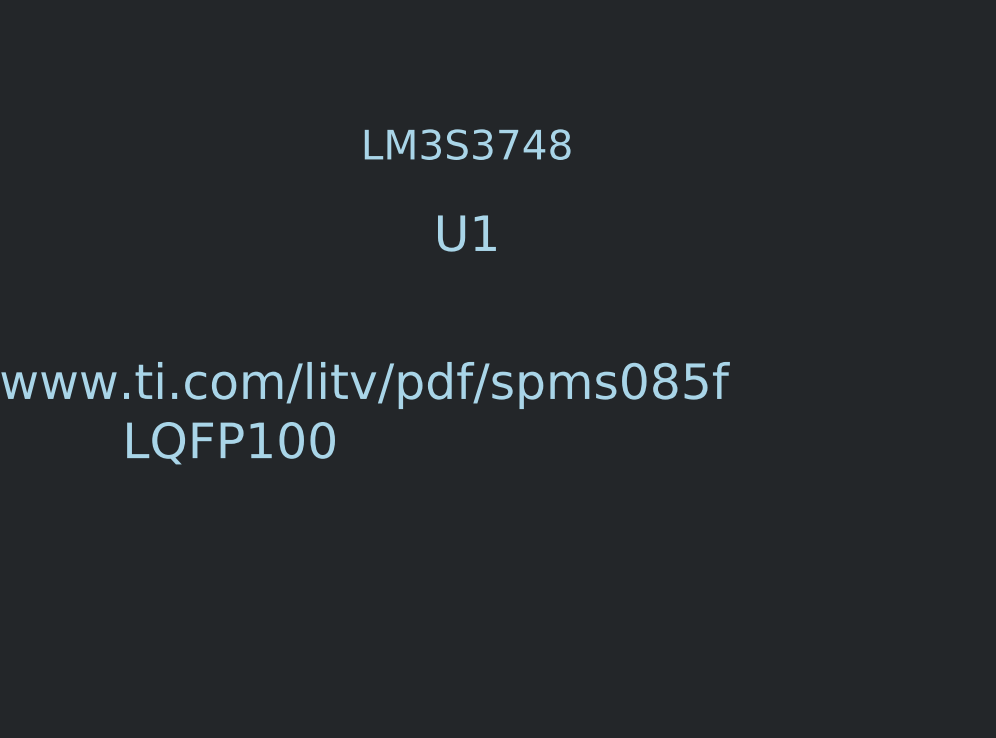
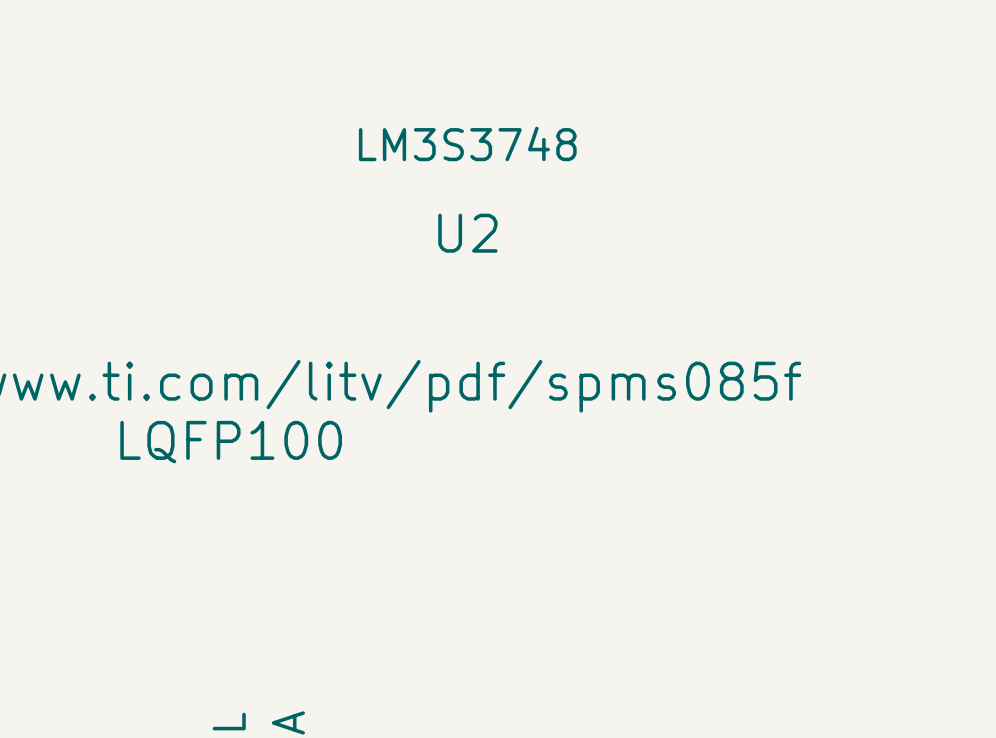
U1 name: U1 (466, 233) -> U2 (467, 233)

